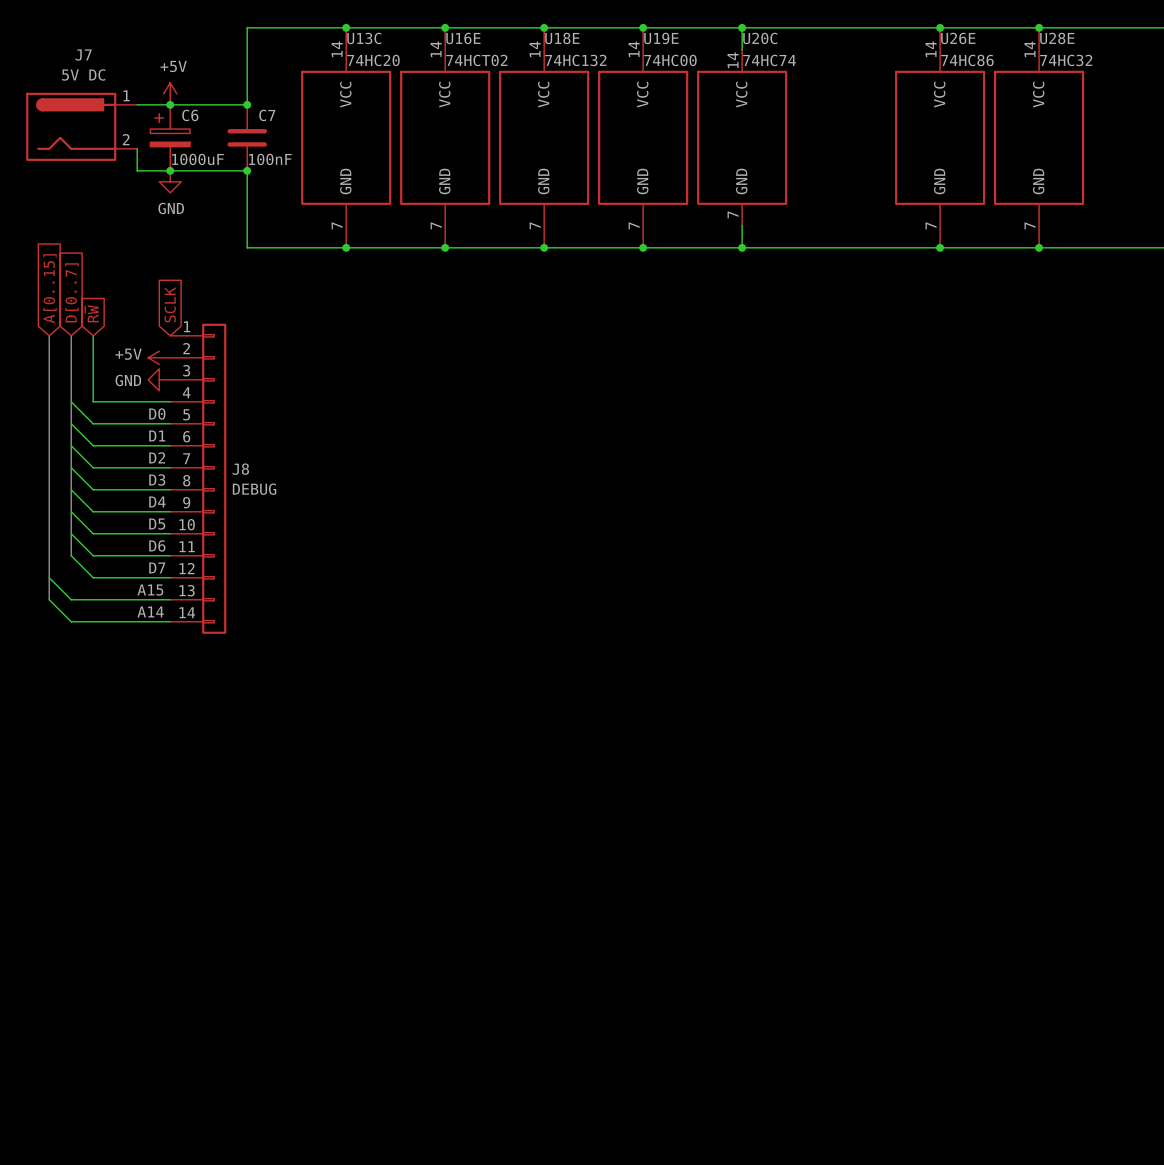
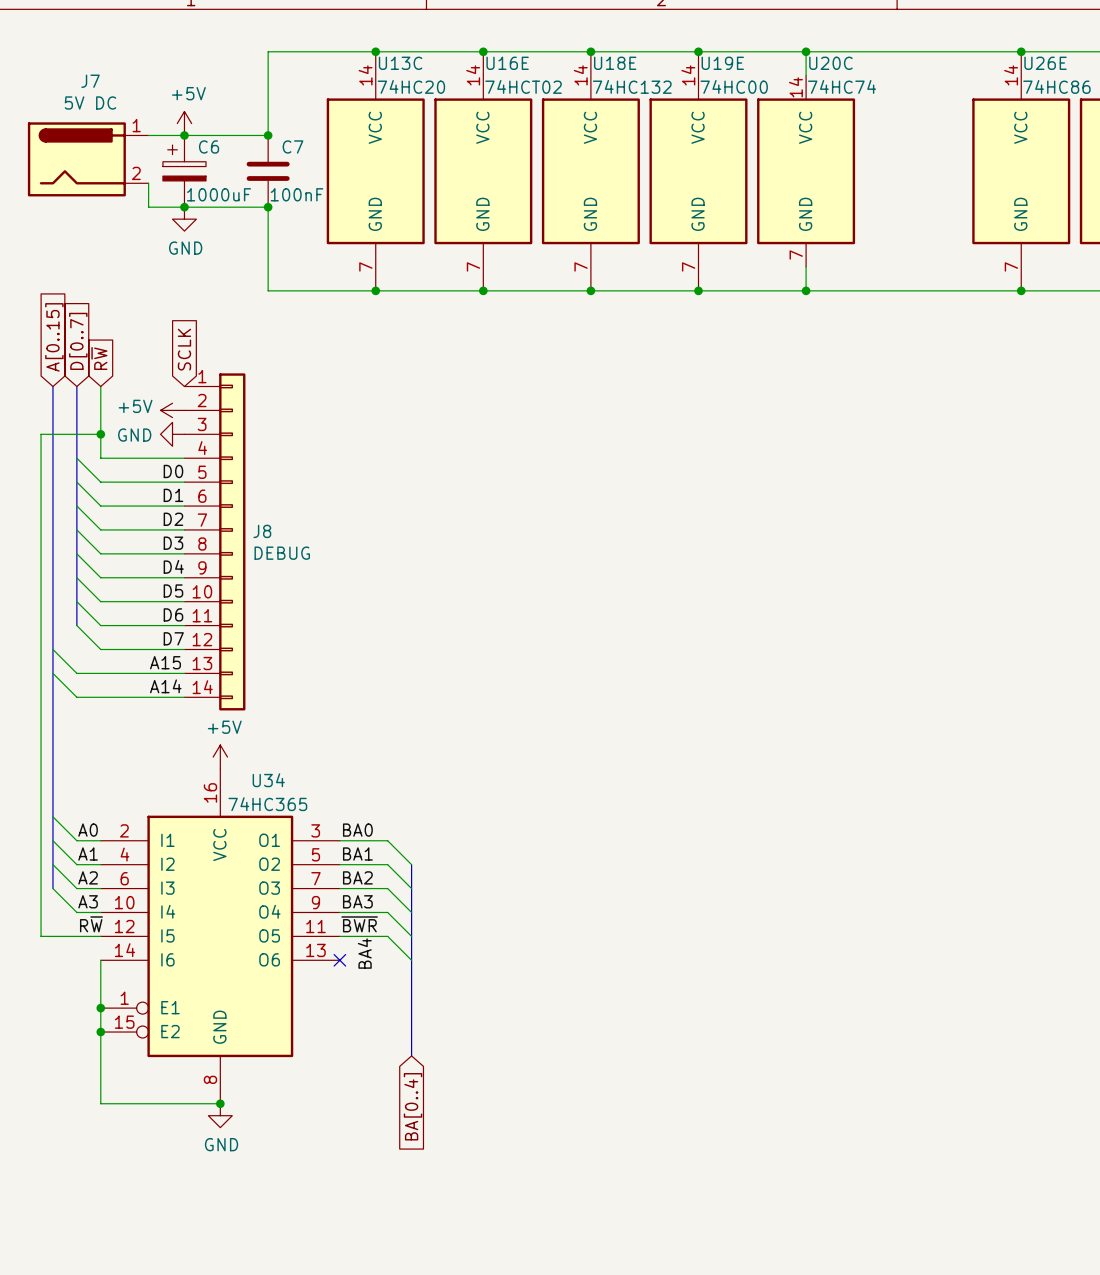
wire: none -> (100, 434) (41, 434) (41, 936) (100, 936)
junction: none -> (100, 434)
bus: none -> (52, 673) (52, 888)
power symbol: none -> +5V (220, 757)
wire: none -> (52, 816) (76, 840) (100, 840)
label: none -> A0 (88, 830)
label: none -> BA0 (357, 830)
wire: none -> (52, 840) (76, 864) (100, 864)
wire: none -> (339, 840) (387, 840) (411, 864)
label: none -> A1 (88, 853)
label: none -> BA1 (357, 853)
wire: none -> (52, 864) (76, 888) (100, 888)
wire: none -> (339, 864) (387, 864) (411, 888)
bus: none -> (411, 864) (411, 1055)
label: none -> A2 (88, 877)
label: none -> BA2 (357, 877)
wire: none -> (52, 888) (76, 912) (100, 912)
wire: none -> (339, 888) (387, 888) (411, 912)
label: none -> A3 (88, 901)
label: none -> BA3 (357, 901)
wire: none -> (339, 912) (387, 912) (411, 936)
label: none -> R~{W} (91, 924)
label: none -> ~{BWR} (359, 924)
U34: none -> 74HC365 (220, 936)
wire: none -> (339, 936) (387, 936) (411, 960)
label: none -> BA4 (364, 953)
wire: none -> (100, 960) (100, 1103) (220, 1103)
no-connect mark: none -> (339, 960)
junction: none -> (100, 1008)
junction: none -> (100, 1032)
junction: none -> (220, 1103)
global label: none -> BA[0..4] (413, 1106)
power symbol: none -> GND (220, 1115)

